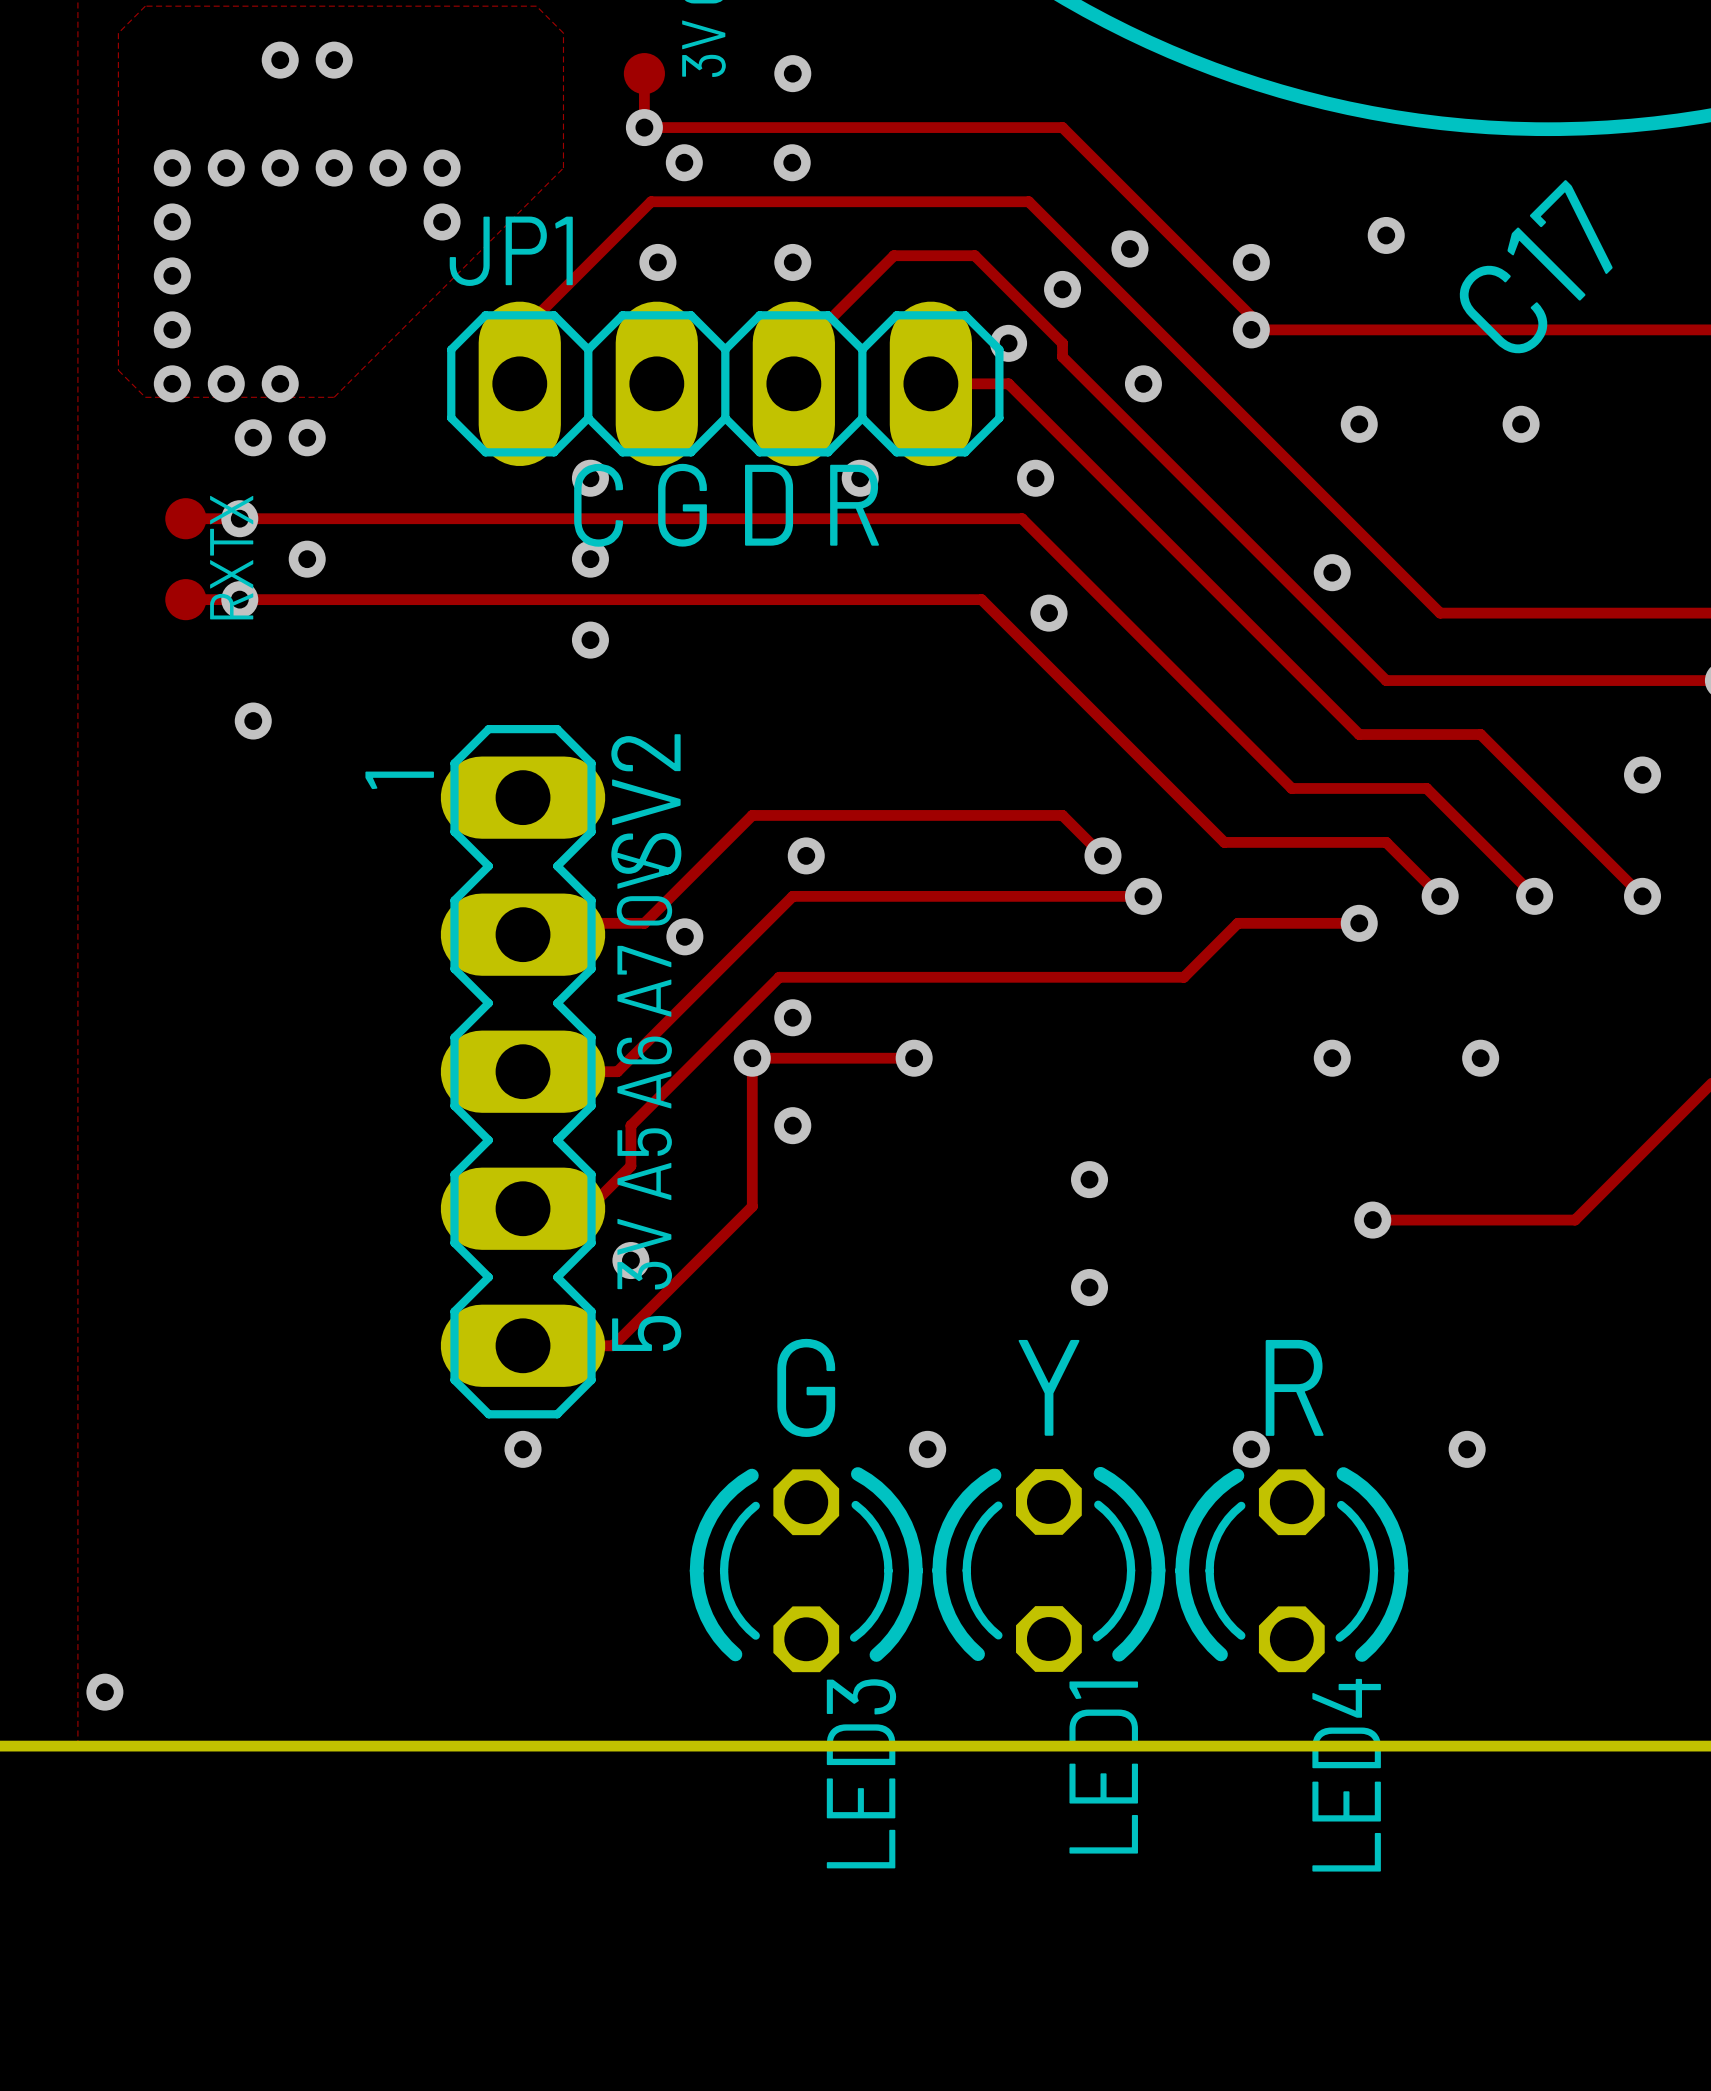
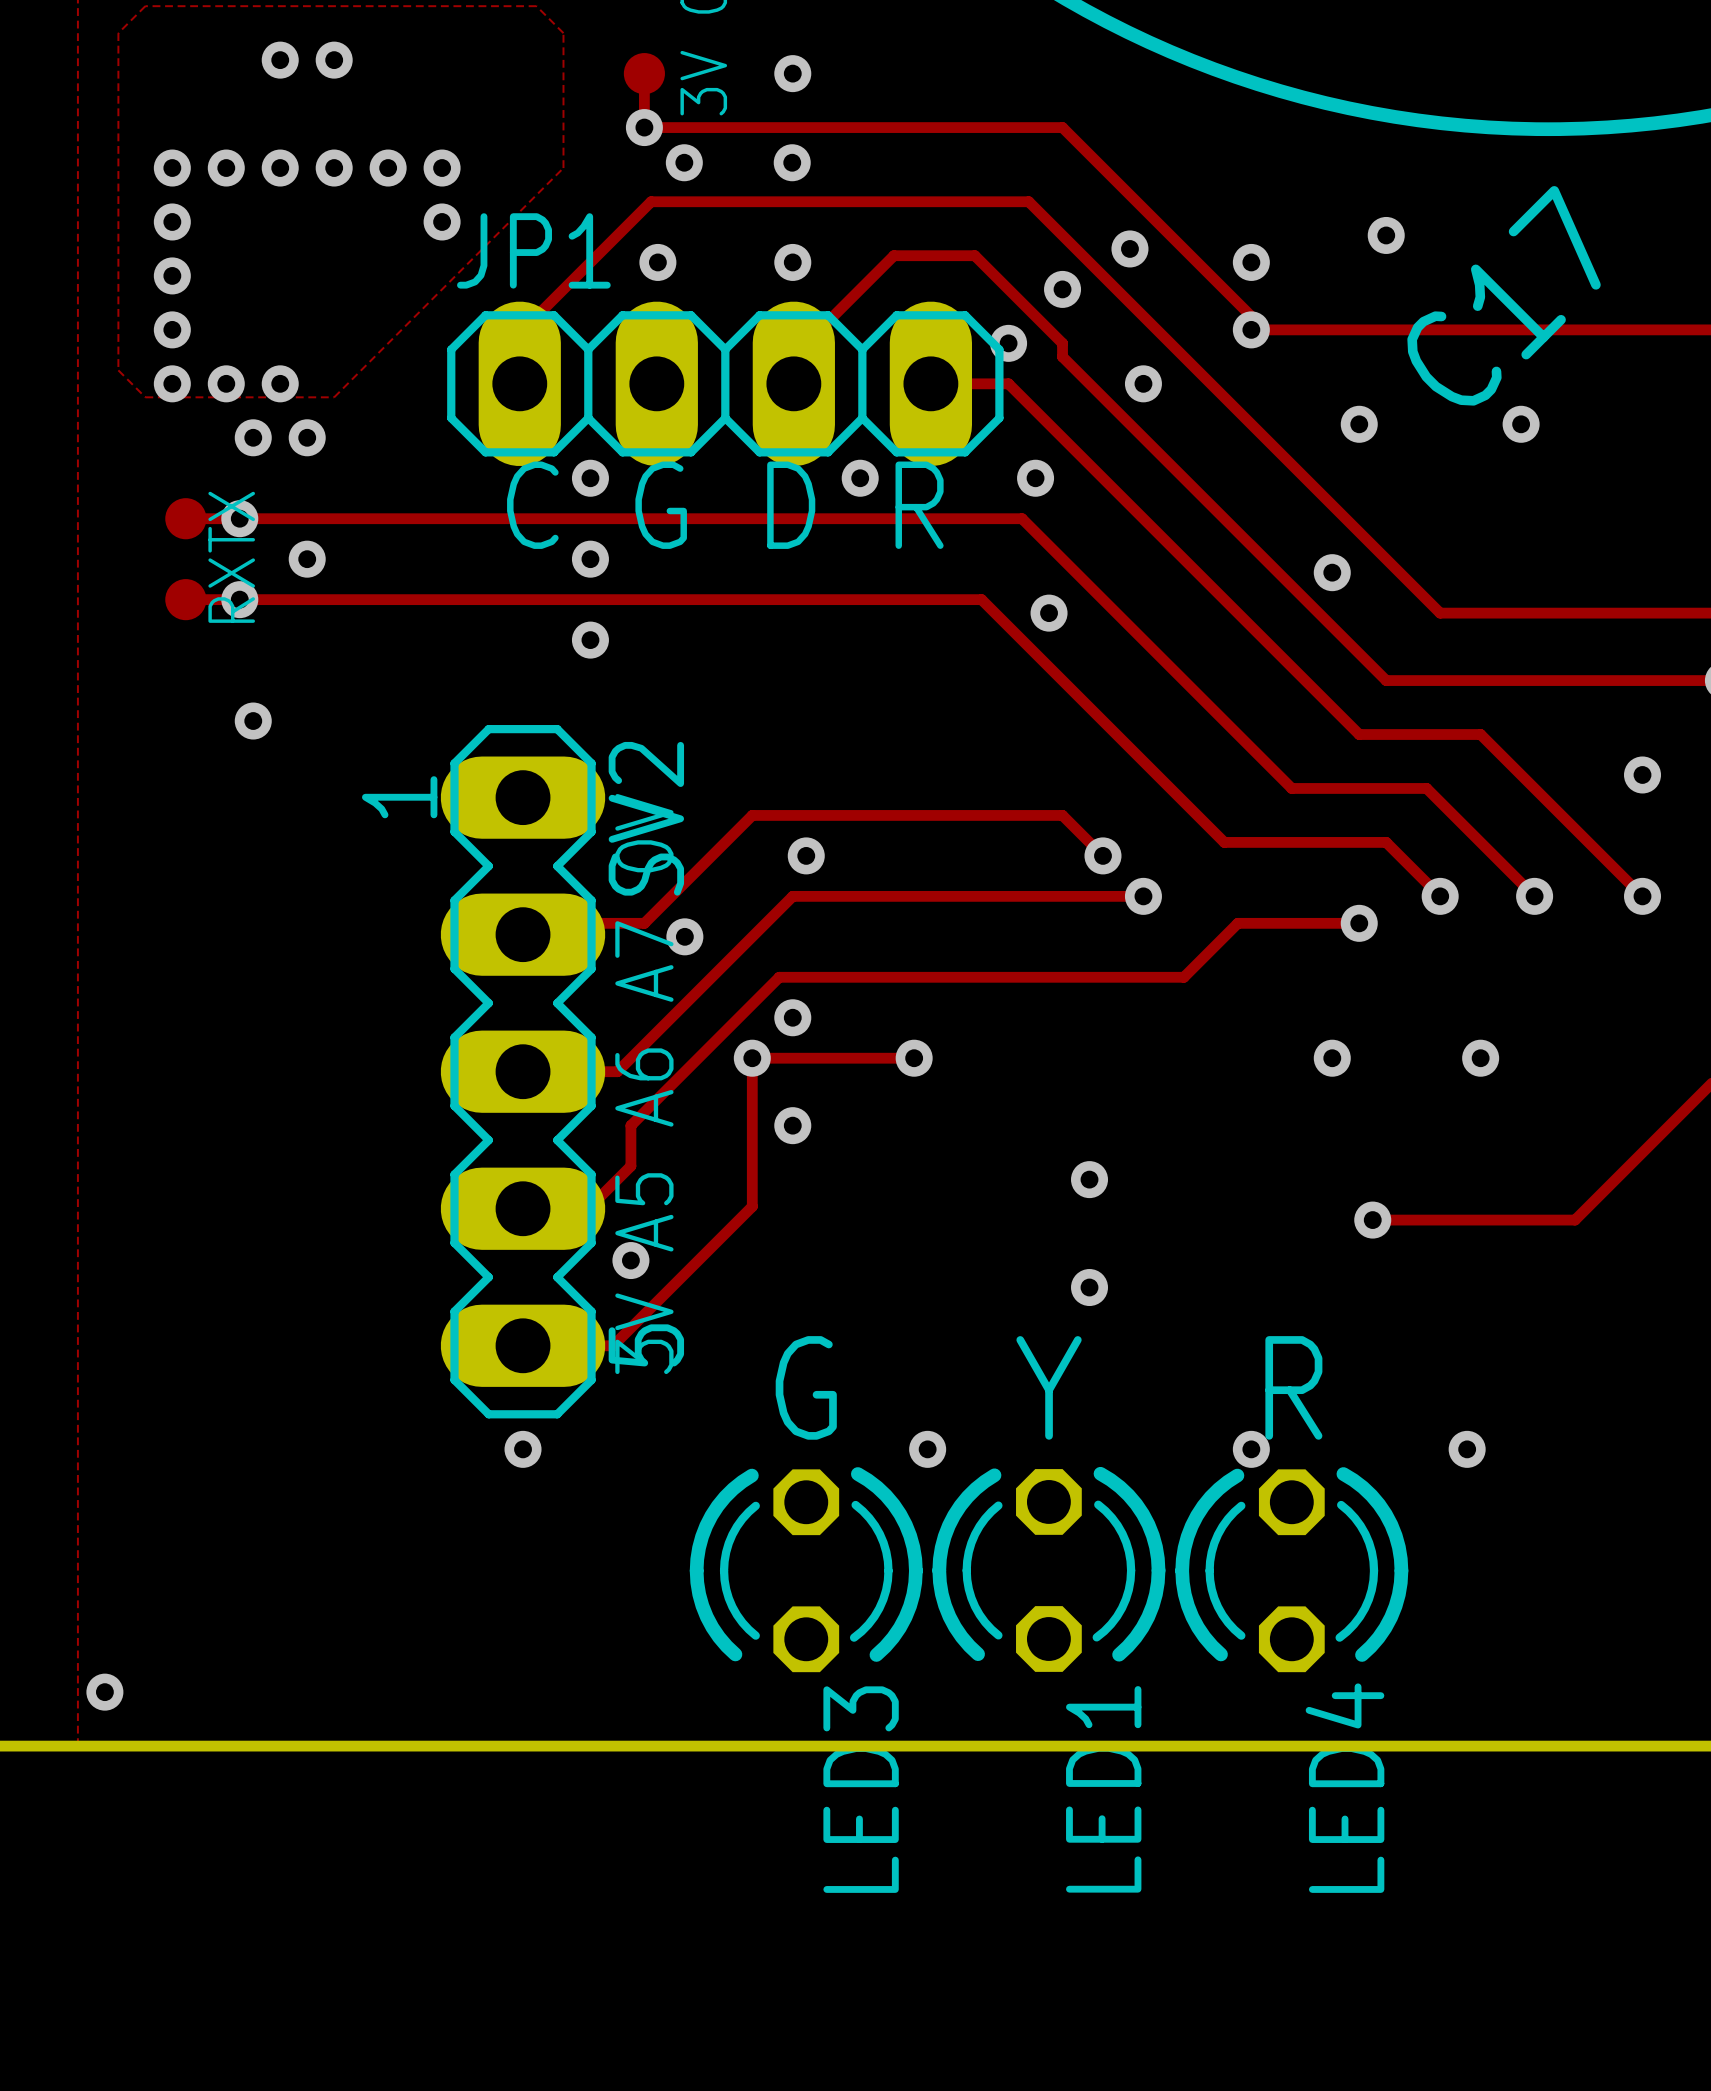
text position: 3V A5 A6 A7 0V (644, 1071) -> 3V A5 A6 A7 0V (644, 1084)

